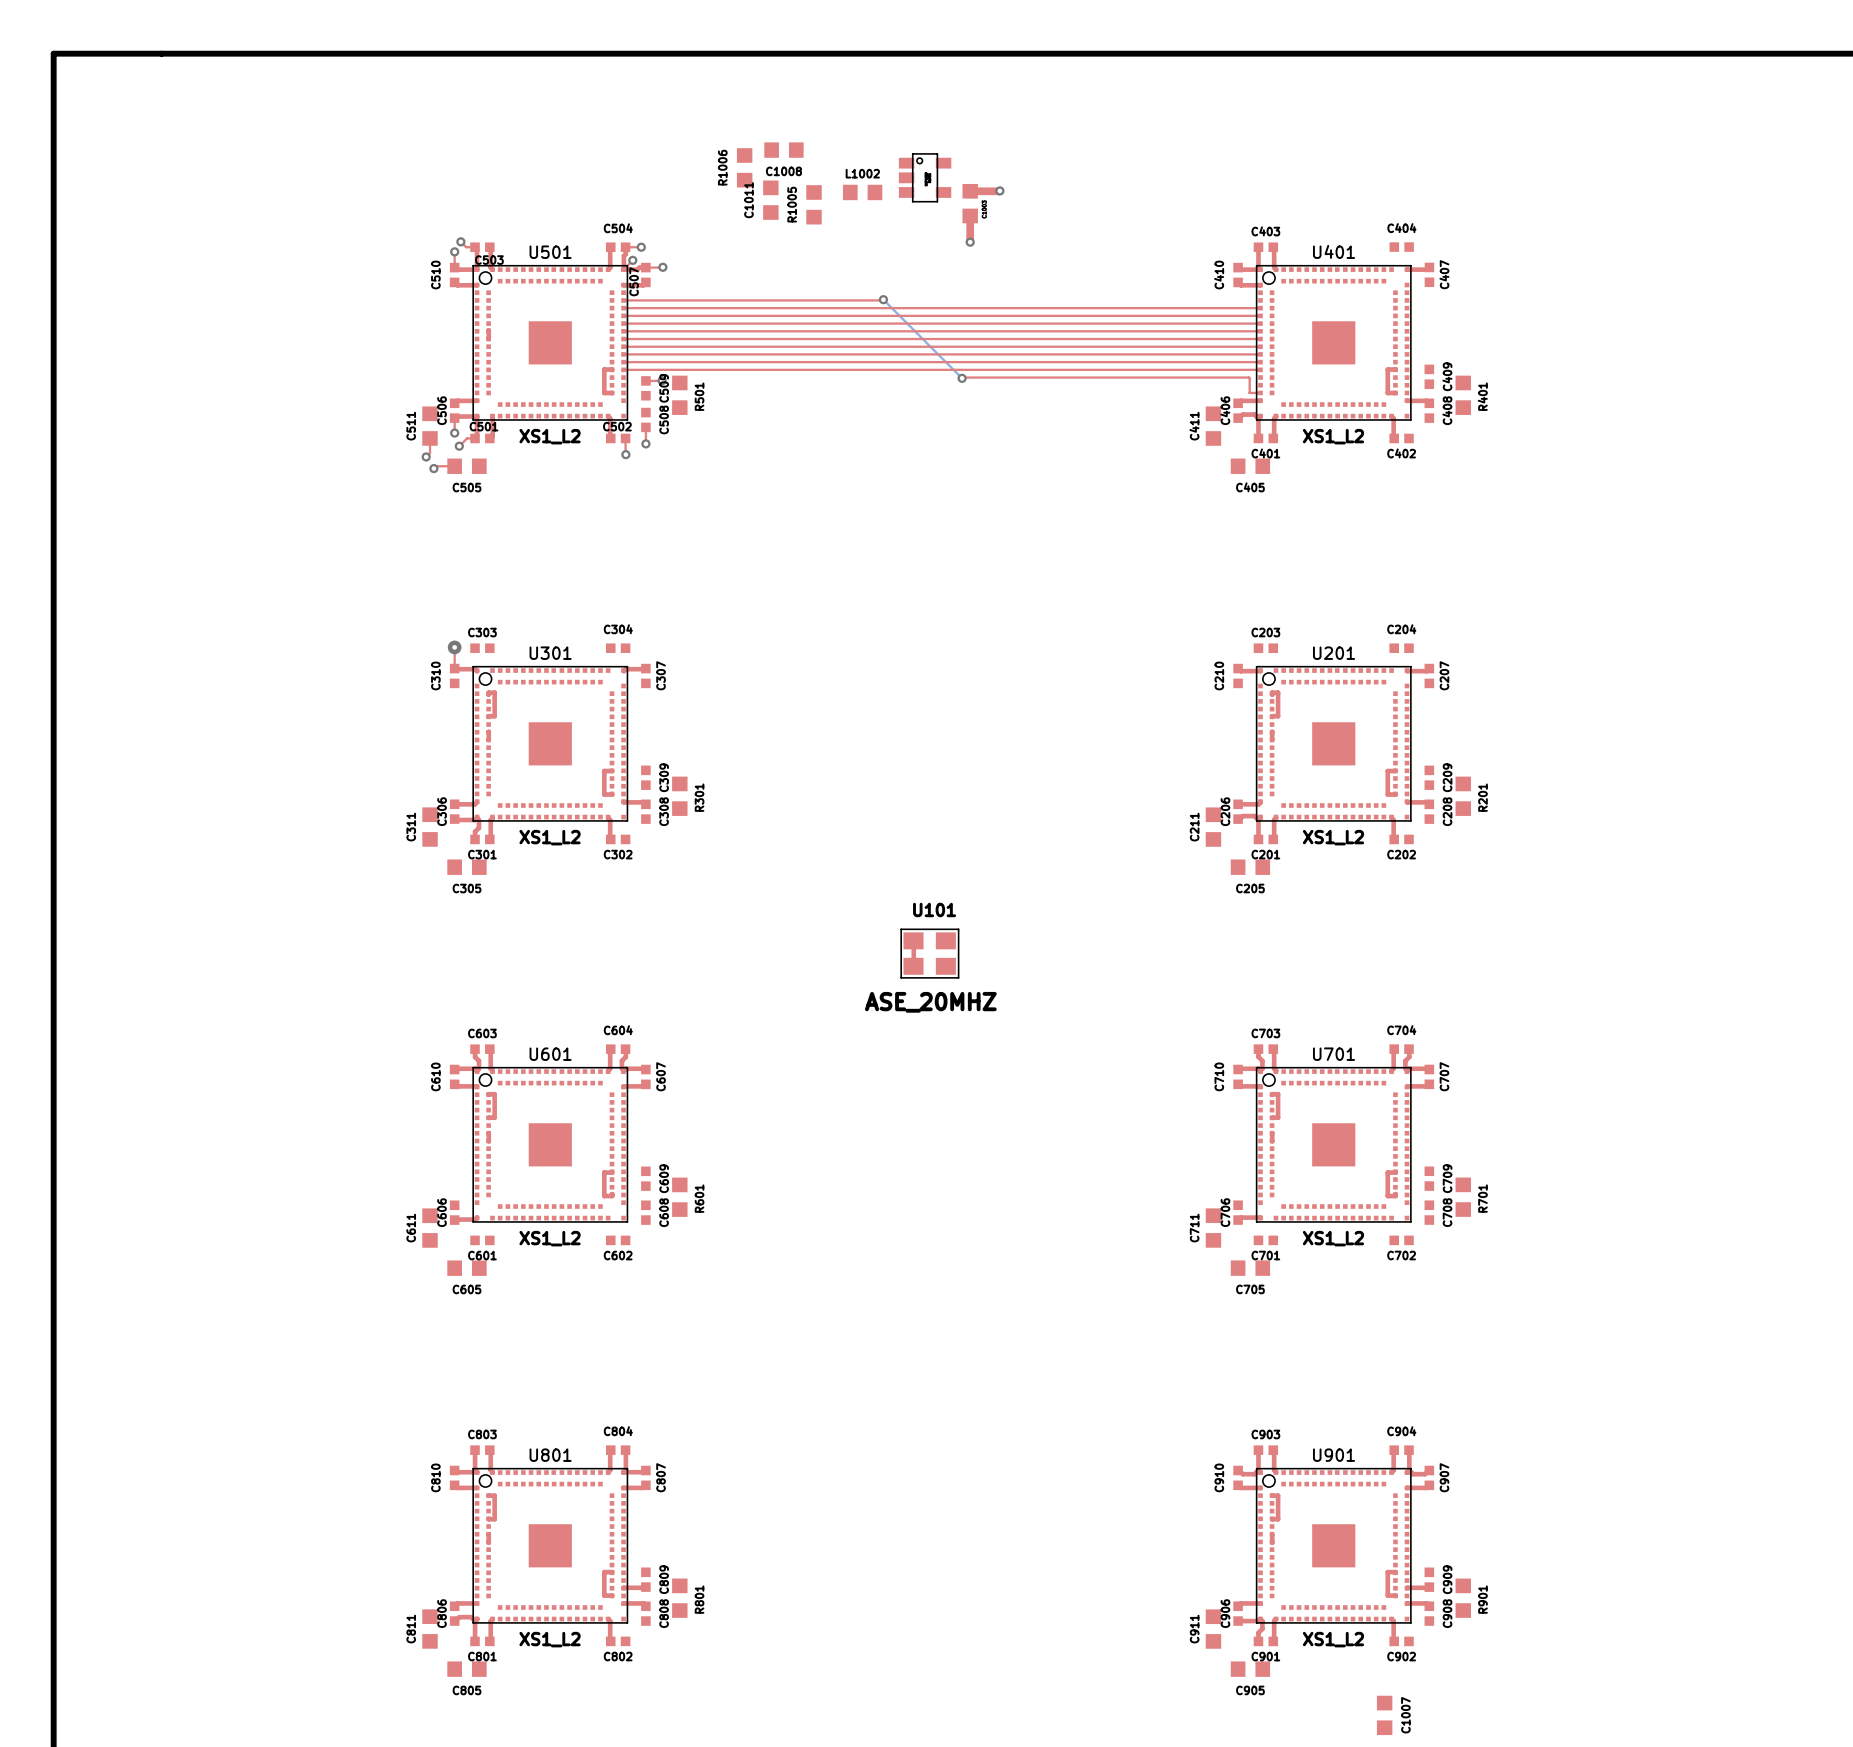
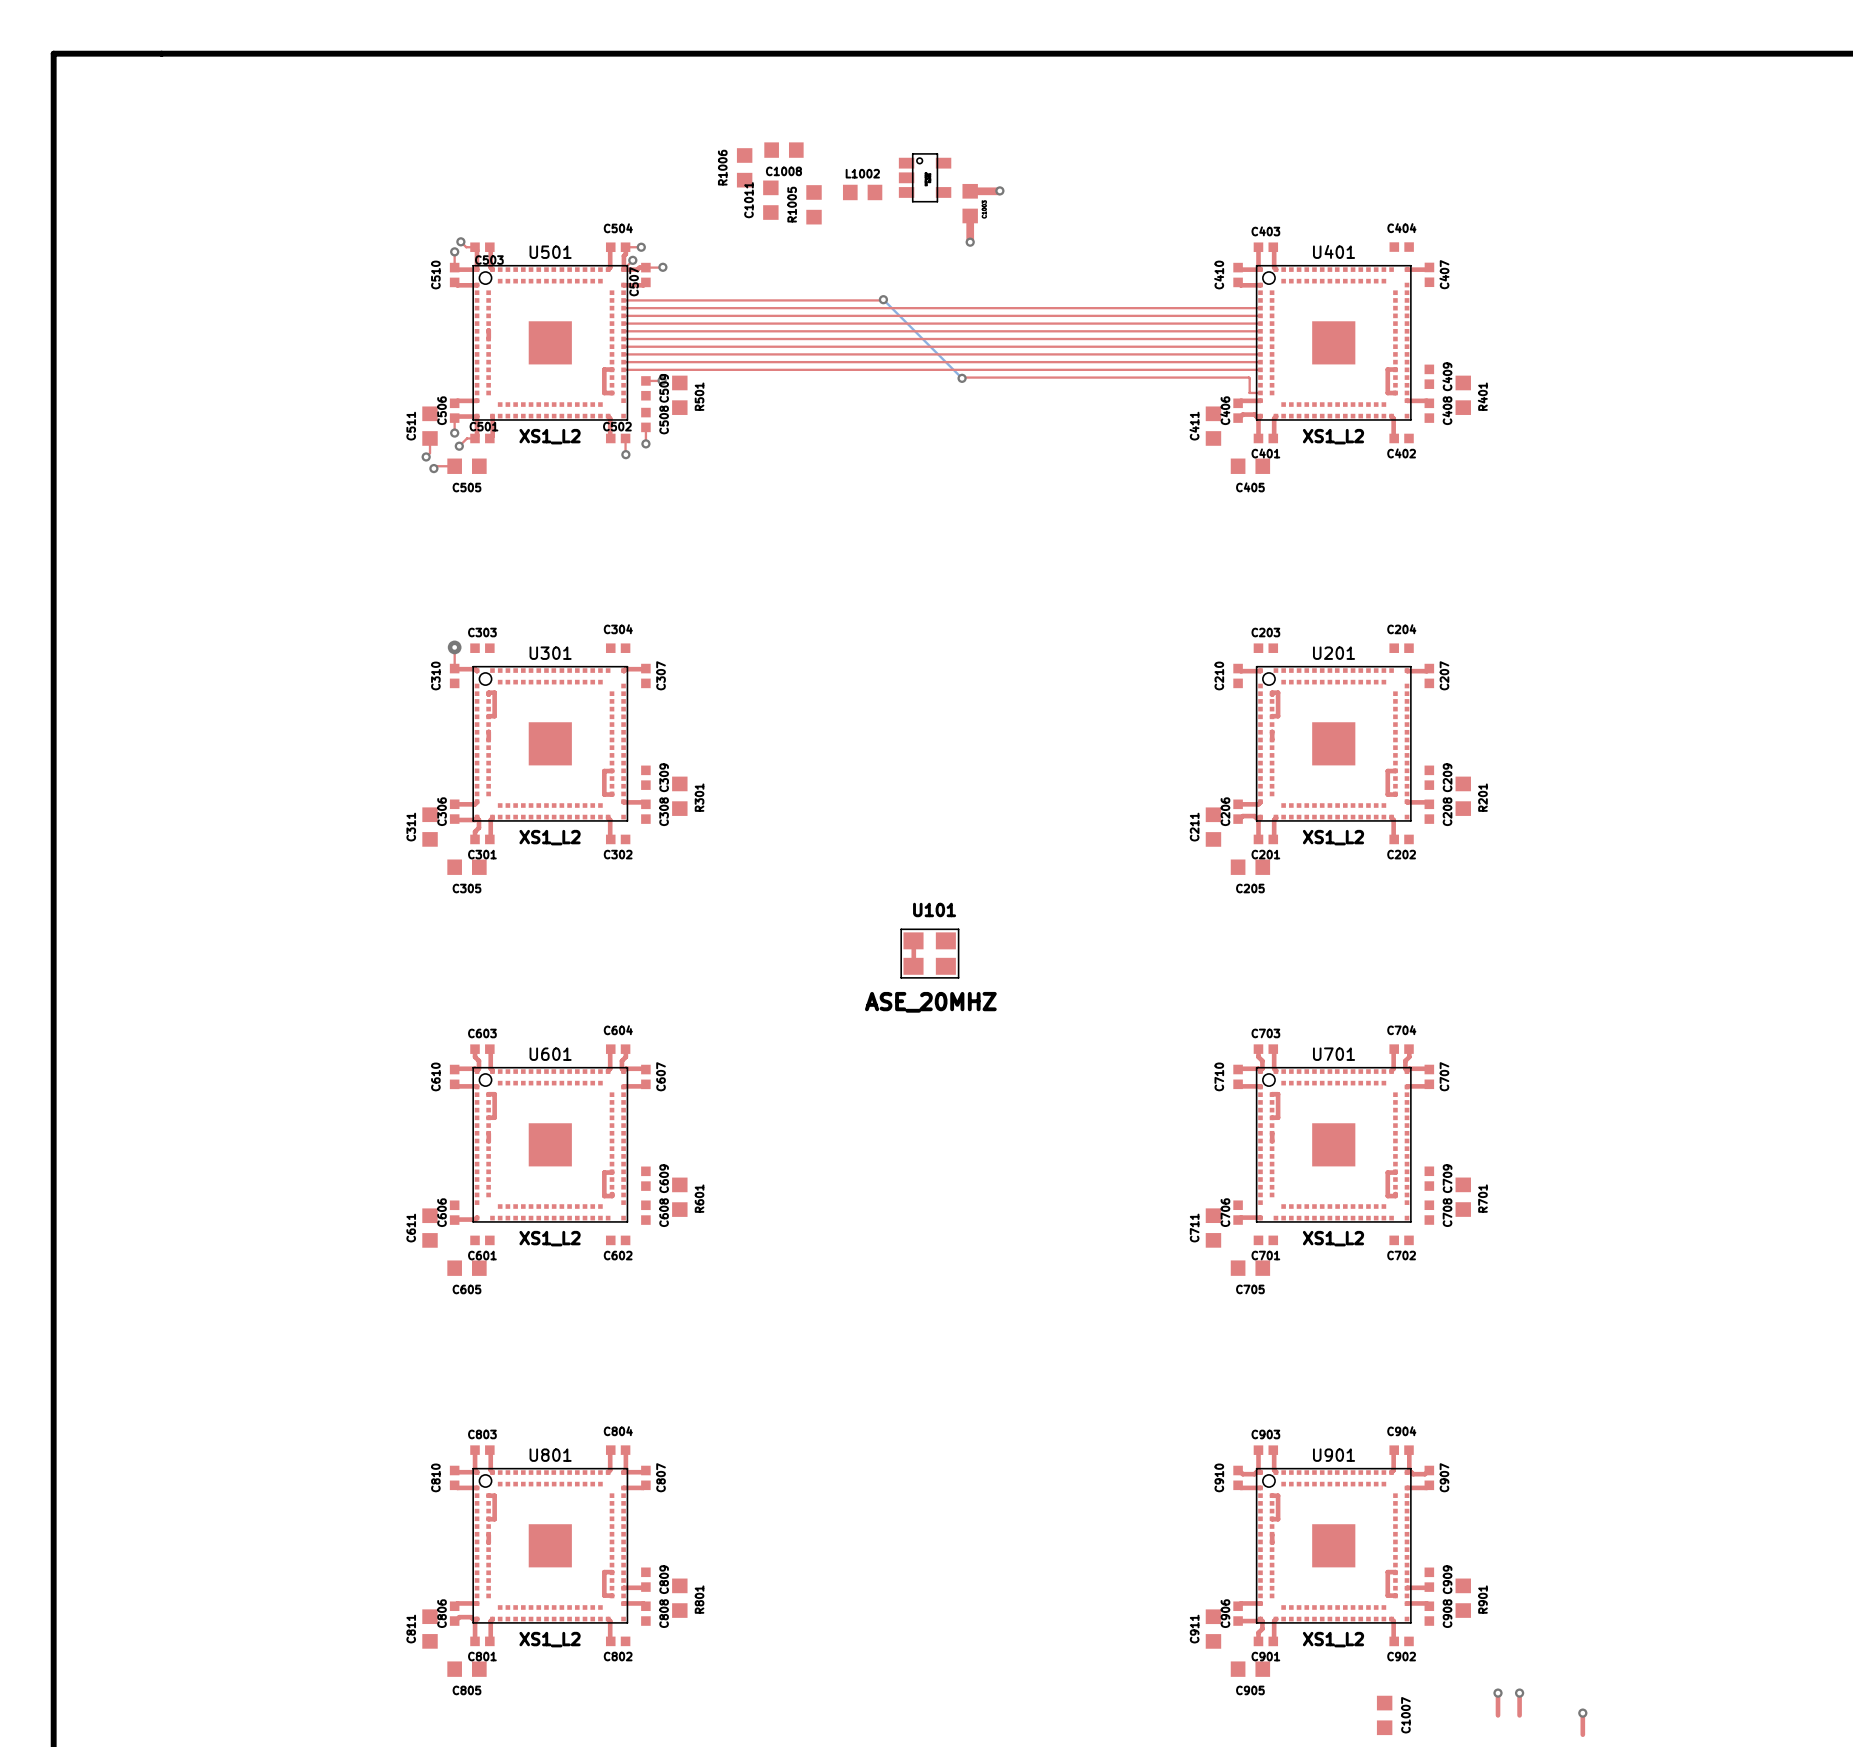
top track: none -> (1498, 1693) (1498, 1715)
via: none -> (1498, 1693)
top track: none -> (1519, 1693) (1519, 1715)
via: none -> (1519, 1693)
top track: none -> (1582, 1713) (1582, 1734)
via: none -> (1582, 1713)

